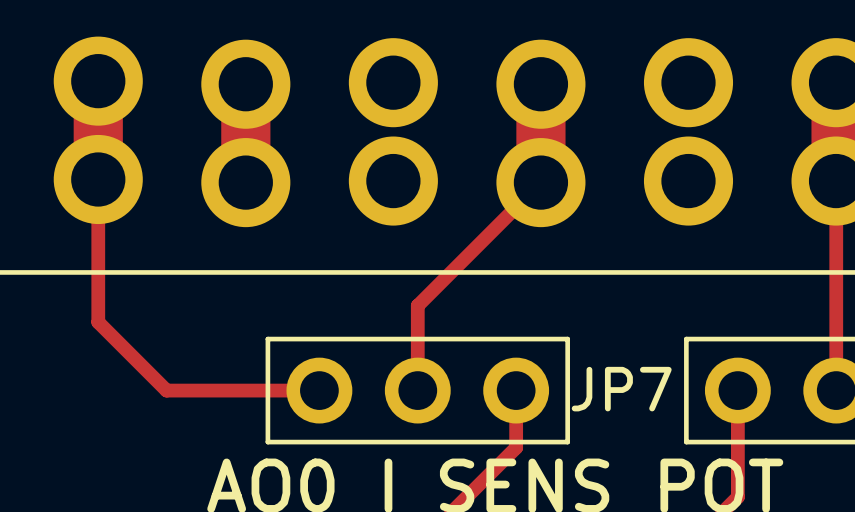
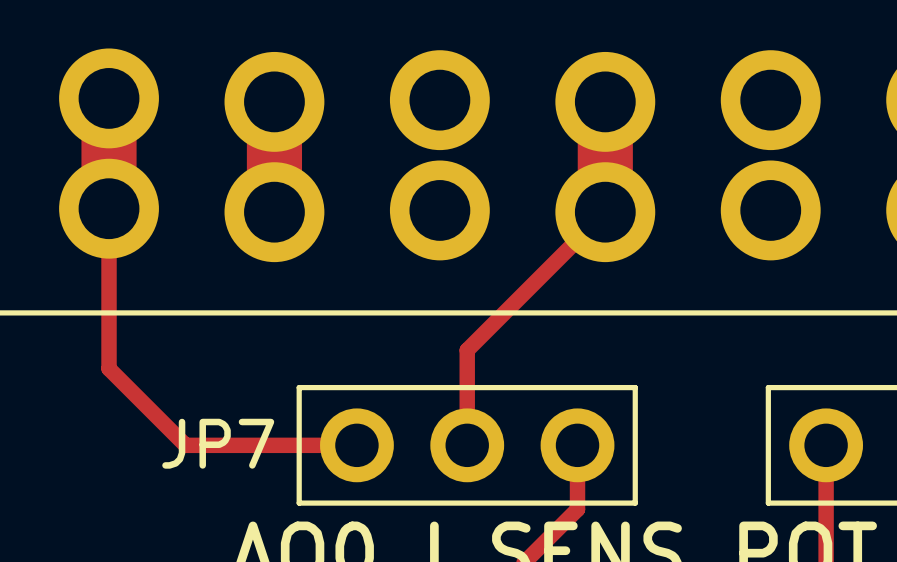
JP7 name position: JP7 (621, 389) -> JP7 (218, 443)

